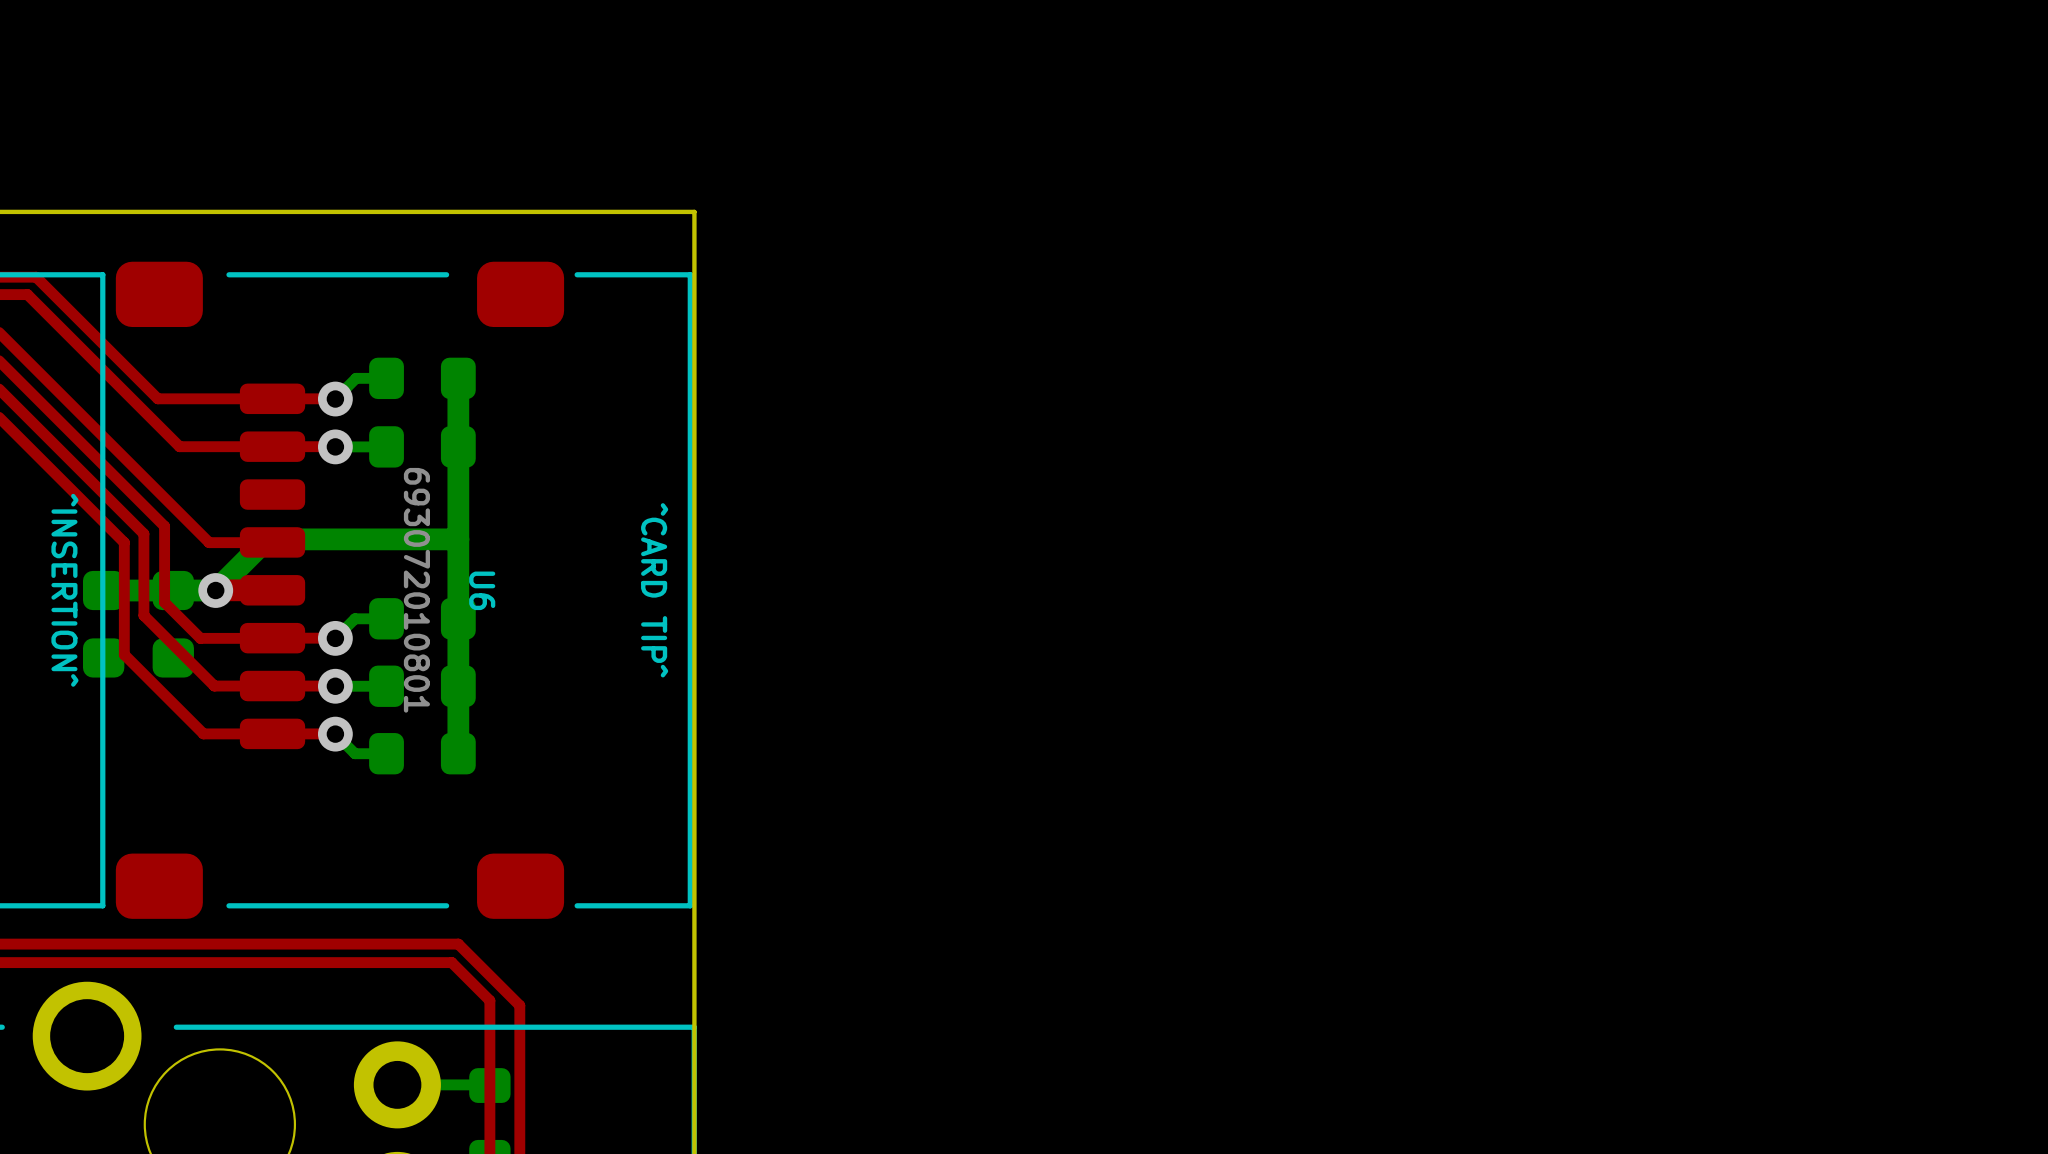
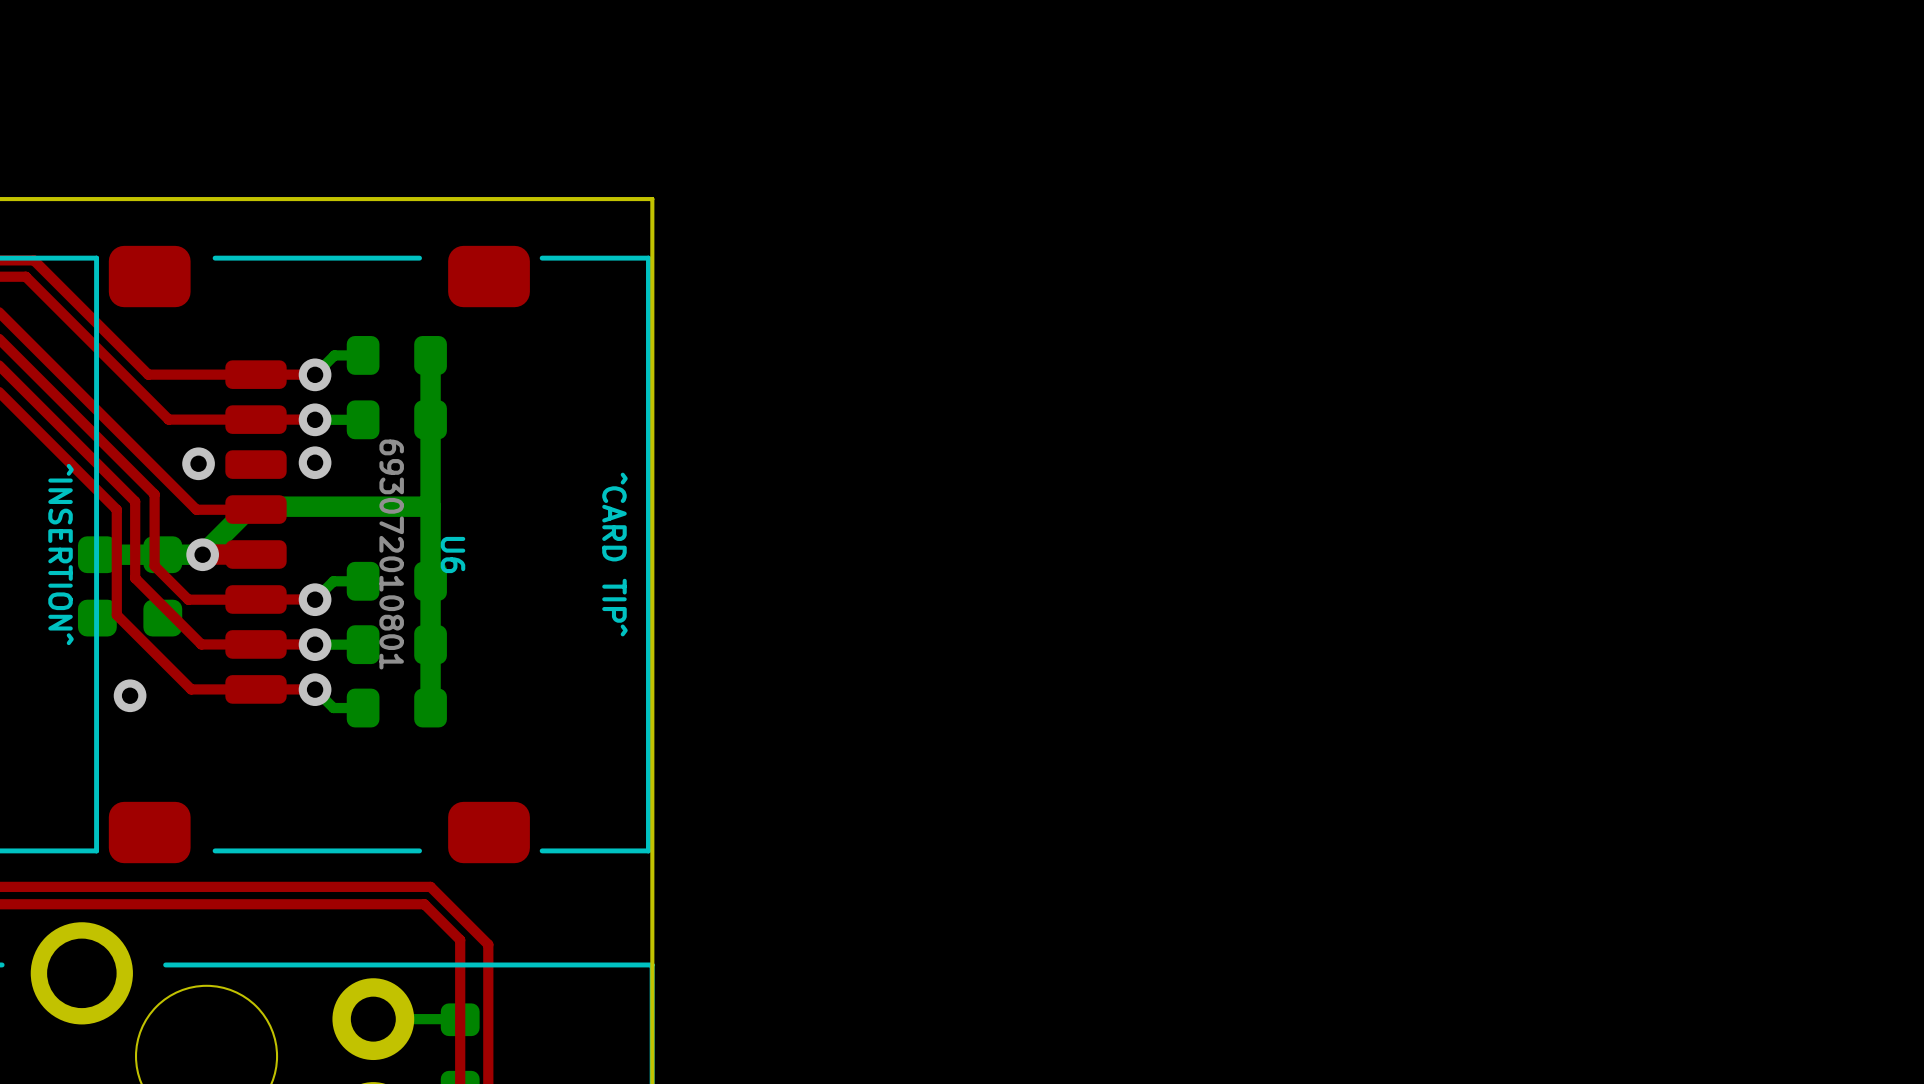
via: none -> (315, 462)
via: none -> (198, 463)
via: none -> (130, 695)

